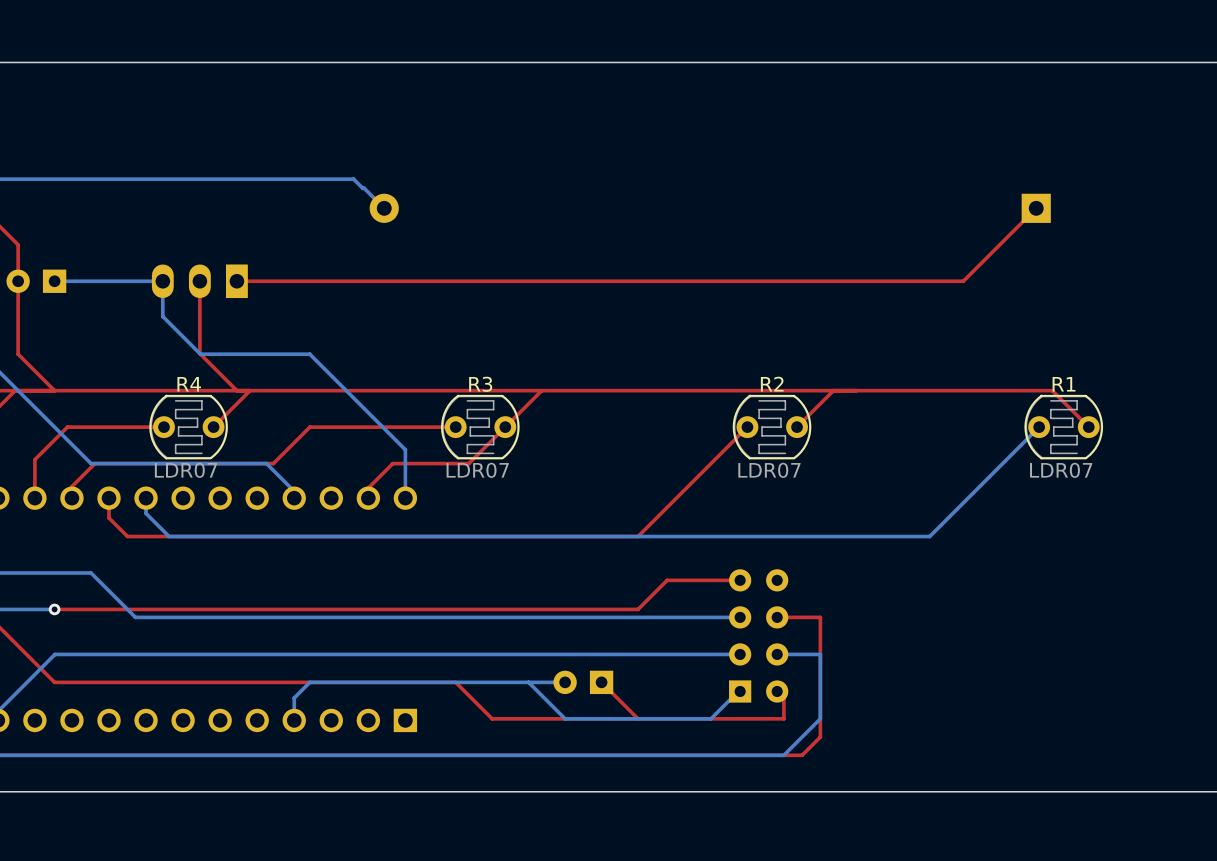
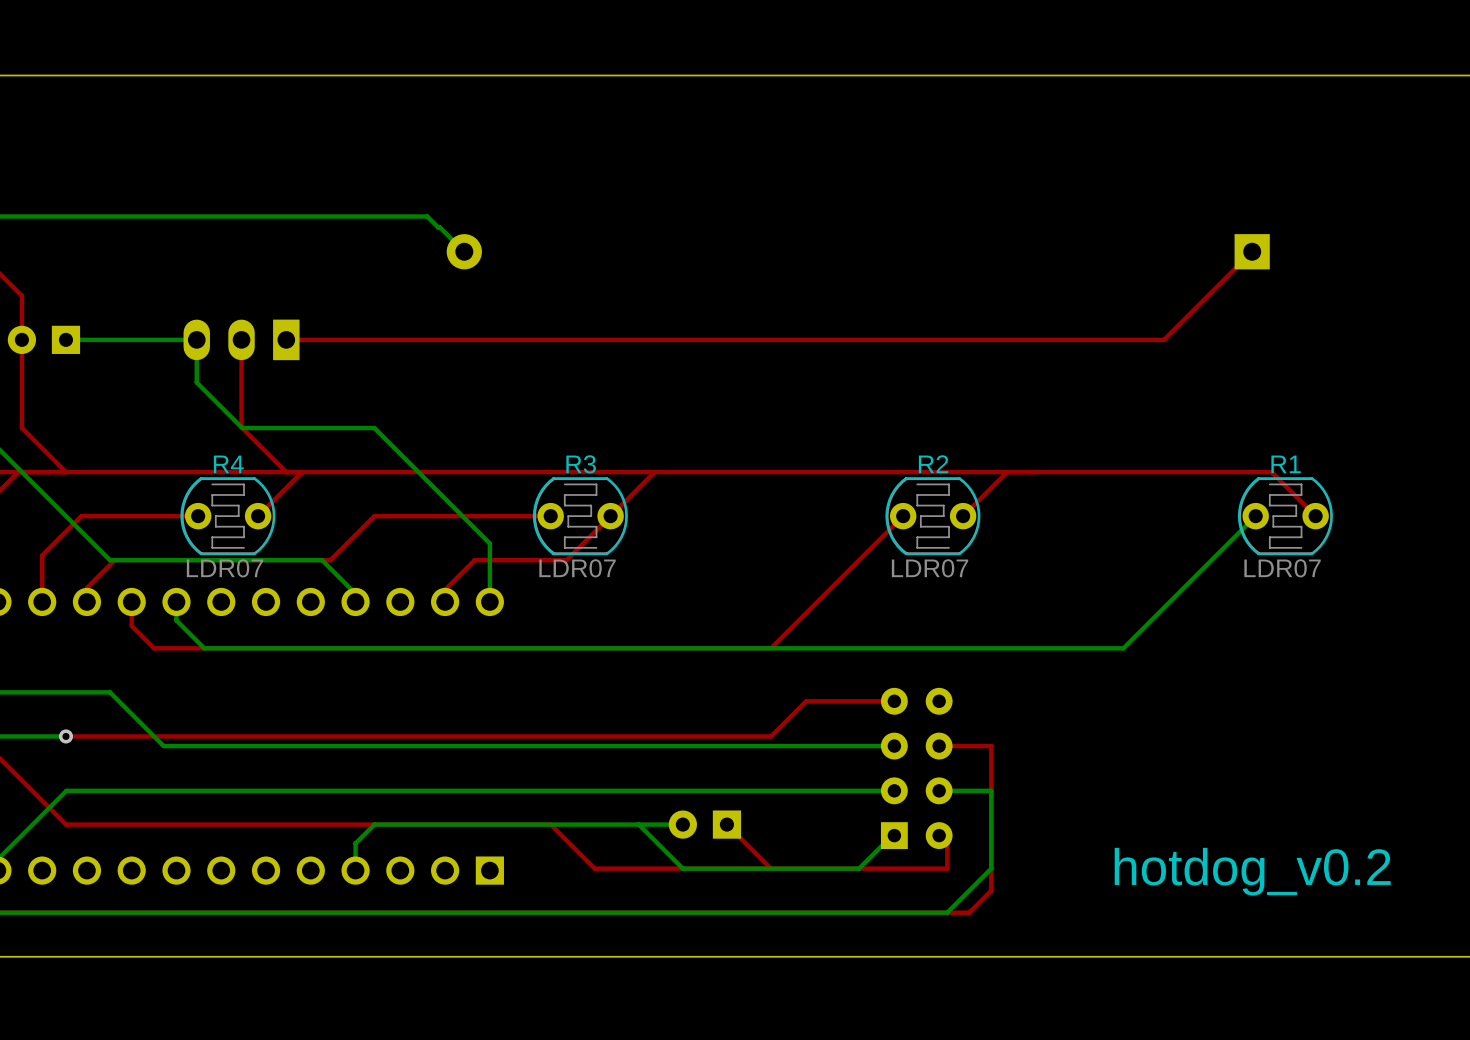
text: none -> hotdog_v0.2 (1252, 871)

